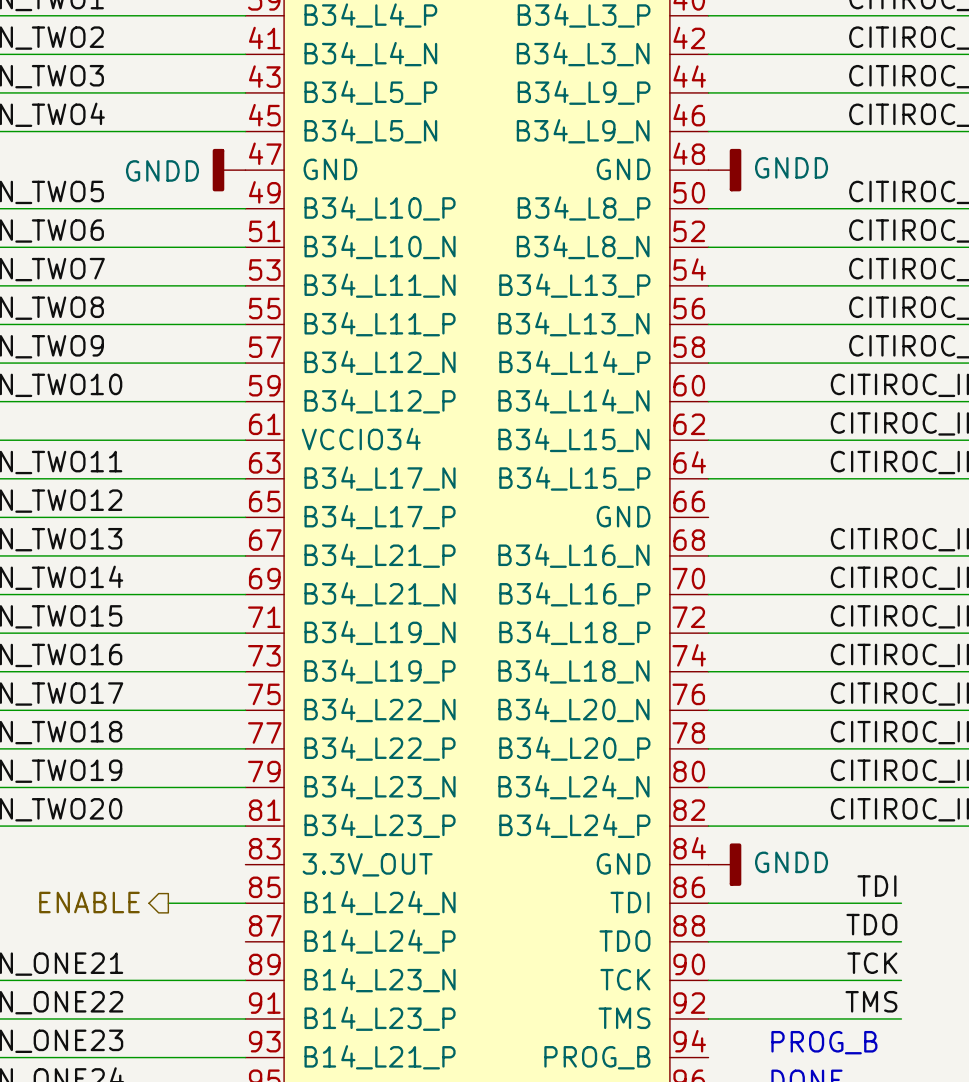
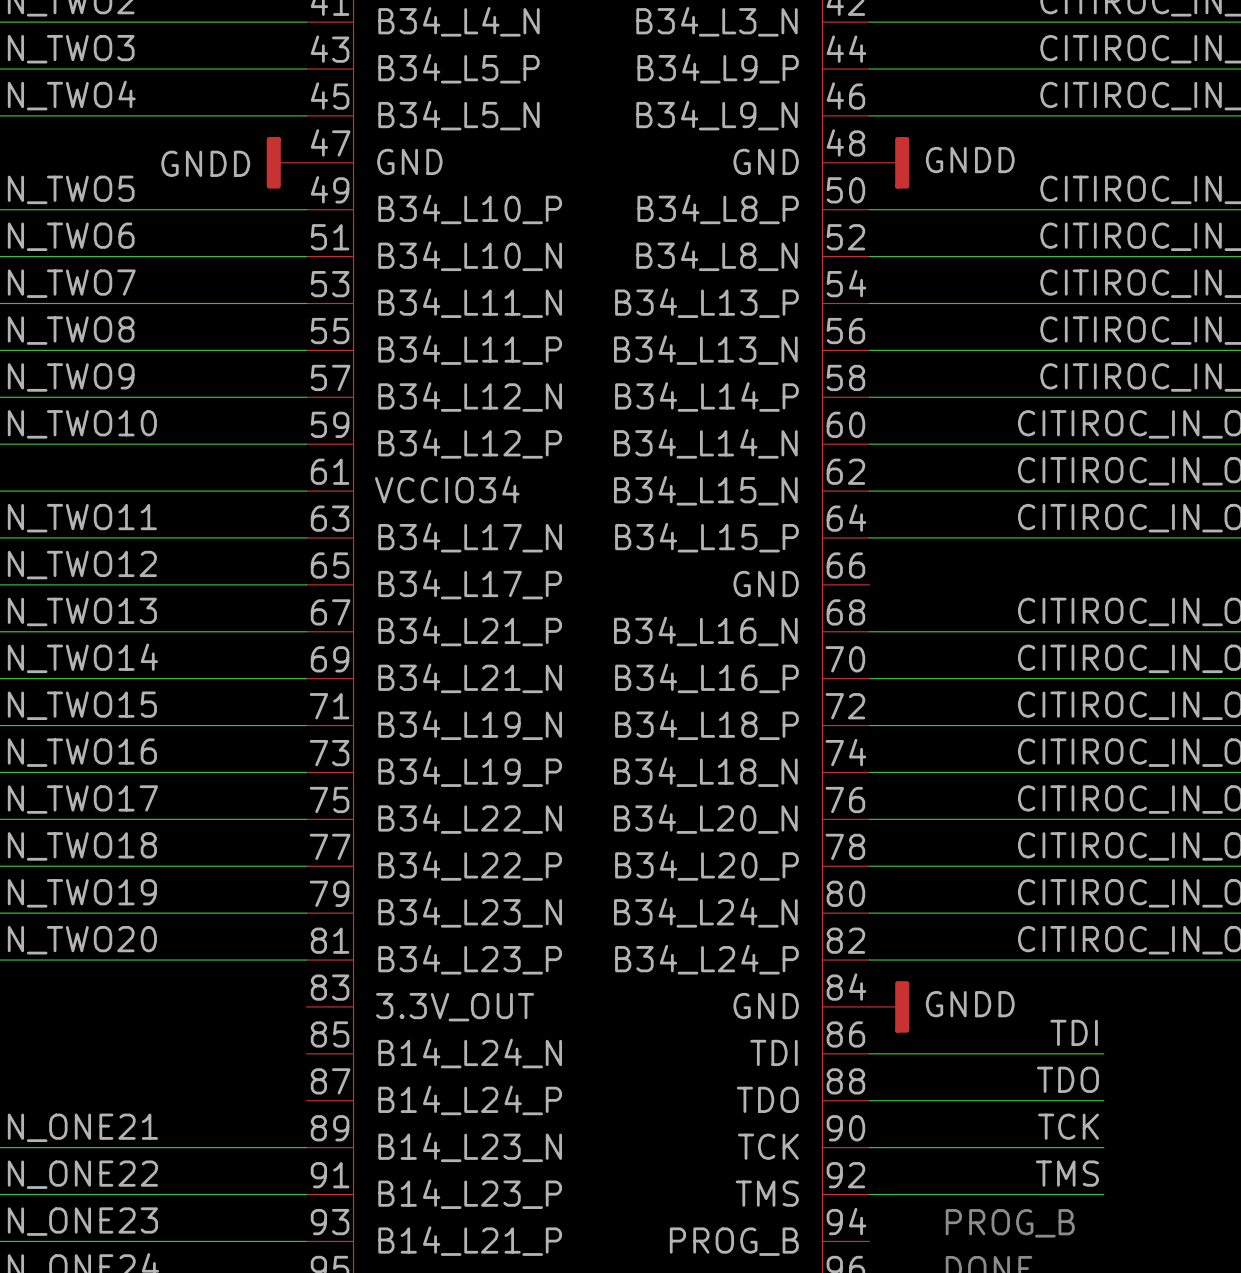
hierarchical label: ENABLE (89, 902) -> none
wire: (168, 903) (245, 903) -> none

